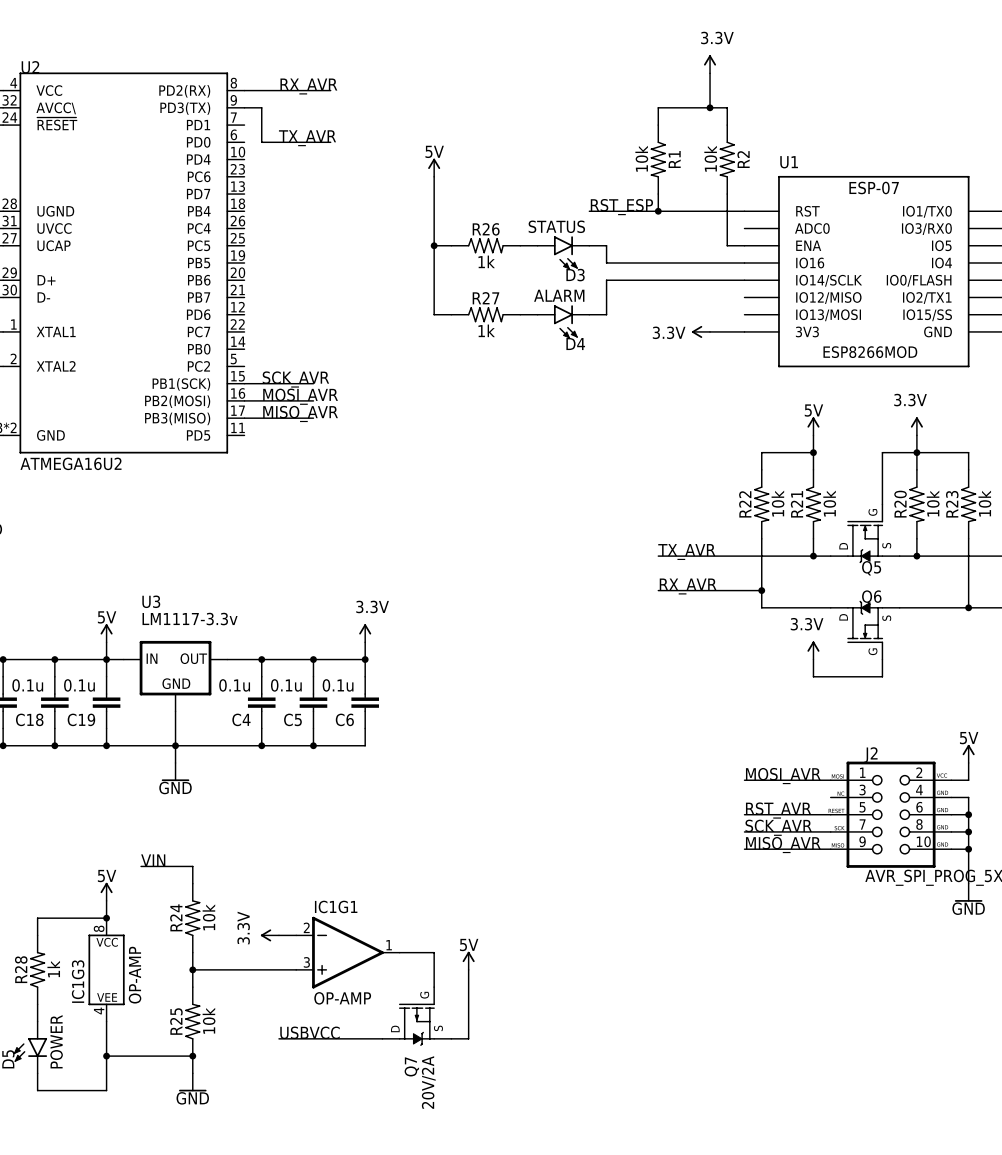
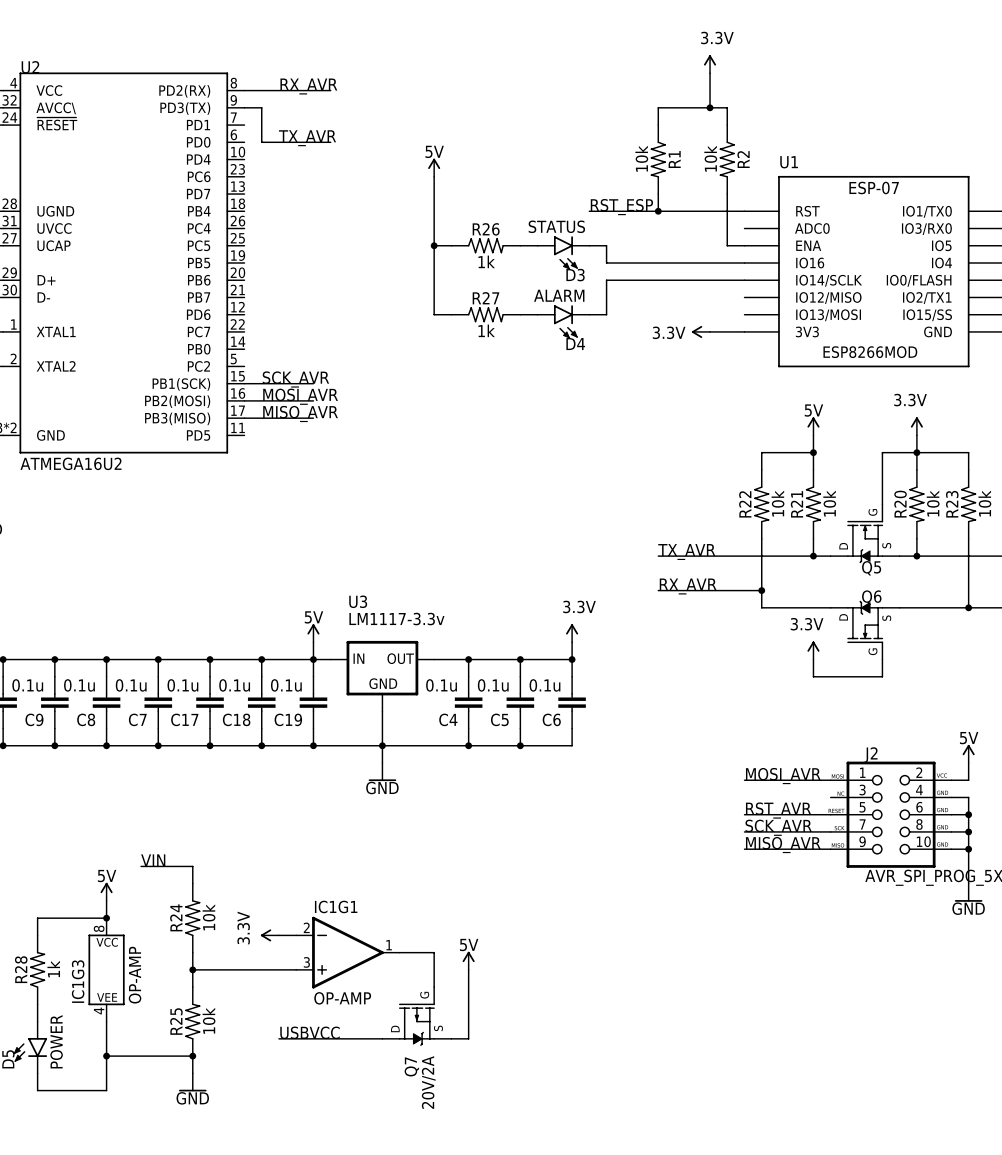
power symbol: 5V (106, 633) -> none
power symbol: none -> 5V (313, 633)
power symbol: 3.3V (365, 633) -> none
power symbol: none -> 3.3V (572, 633)
wire: (106, 642) (106, 659) -> (158, 659) (158, 676)
wire: none -> (313, 642) (313, 659)
wire: (365, 642) (365, 676) -> none
wire: none -> (572, 642) (572, 676)
wire: none -> (123, 659) (227, 659)
junction: none -> (158, 659)
junction: none -> (210, 659)
junction: (365, 659) -> none
wire: none -> (434, 659) (572, 659)
wire: none -> (468, 659) (468, 676)
junction: none -> (468, 659)
wire: none -> (520, 659) (520, 676)
junction: none -> (520, 659)
junction: none -> (572, 659)
U3 position: (175, 676) -> (382, 676)
C7: none -> 0.1u (158, 702)
C17: none -> 0.1u (210, 702)
C6 position: (365, 702) -> (572, 702)
C4: none -> 0.1u (468, 702)
C5: none -> 0.1u (520, 702)
wire: (175, 711) (175, 762) -> none
wire: none -> (382, 711) (382, 762)
C18 name: C18 (29, 719) -> C9 (34, 719)
C19 name: C19 (81, 719) -> C8 (86, 719)
C4 name: C4 (241, 719) -> C18 (236, 719)
C5 name: C5 (292, 719) -> C19 (288, 719)
wire: none -> (158, 728) (158, 745)
wire: none -> (210, 728) (210, 745)
wire: (365, 728) (365, 745) -> (572, 728) (572, 745) (365, 745)
wire: none -> (468, 728) (468, 745)
wire: none -> (520, 728) (520, 745)
junction: none -> (158, 745)
junction: (175, 745) -> none
junction: none -> (210, 745)
junction: none -> (382, 745)
junction: none -> (468, 745)
junction: none -> (520, 745)
power symbol: GND (175, 772) -> none
power symbol: none -> GND (382, 772)

